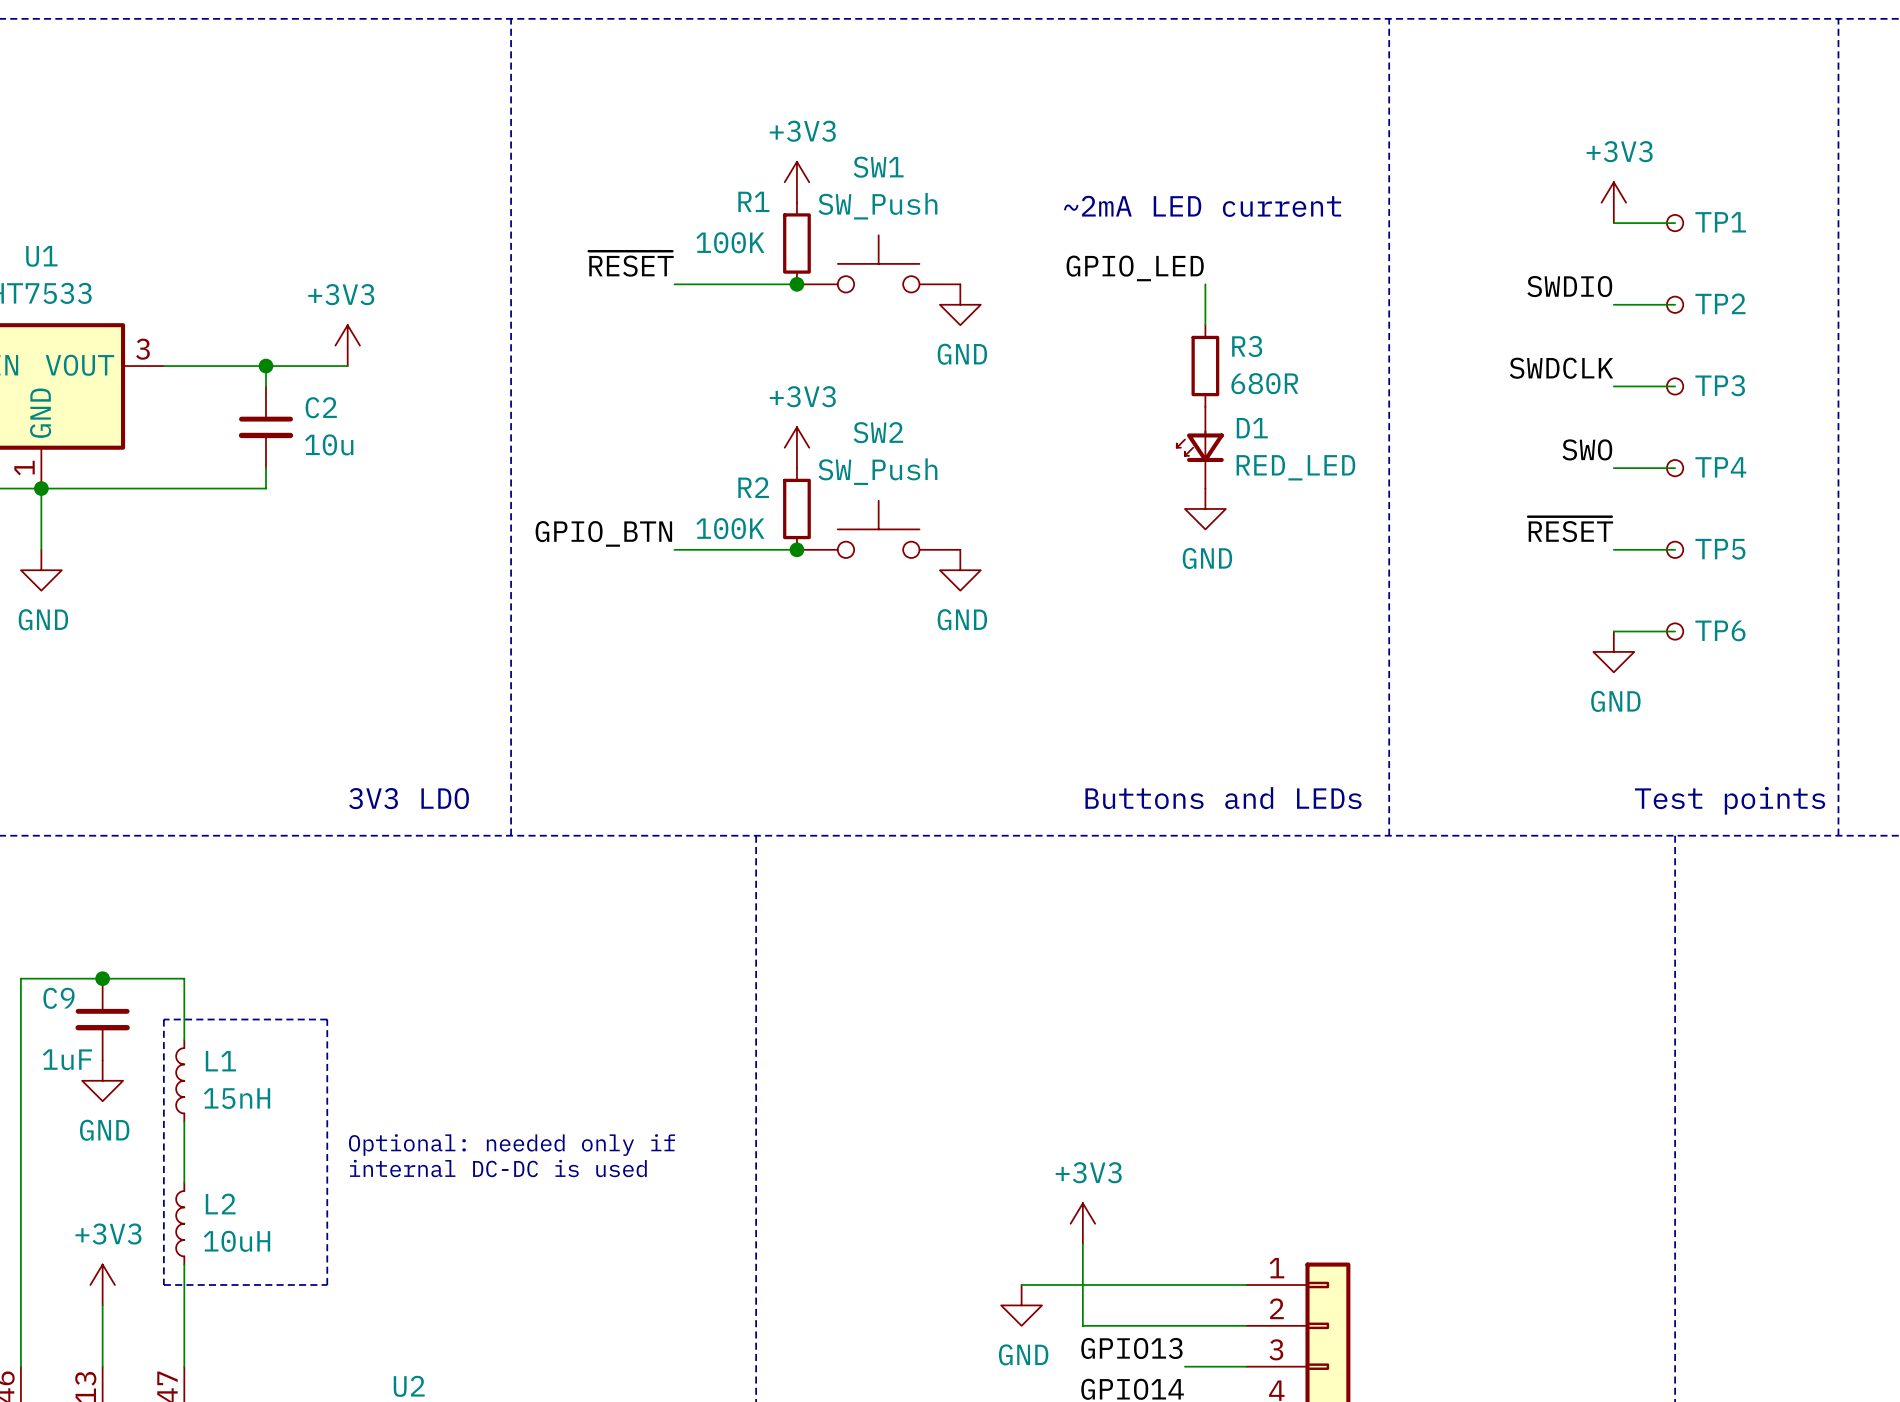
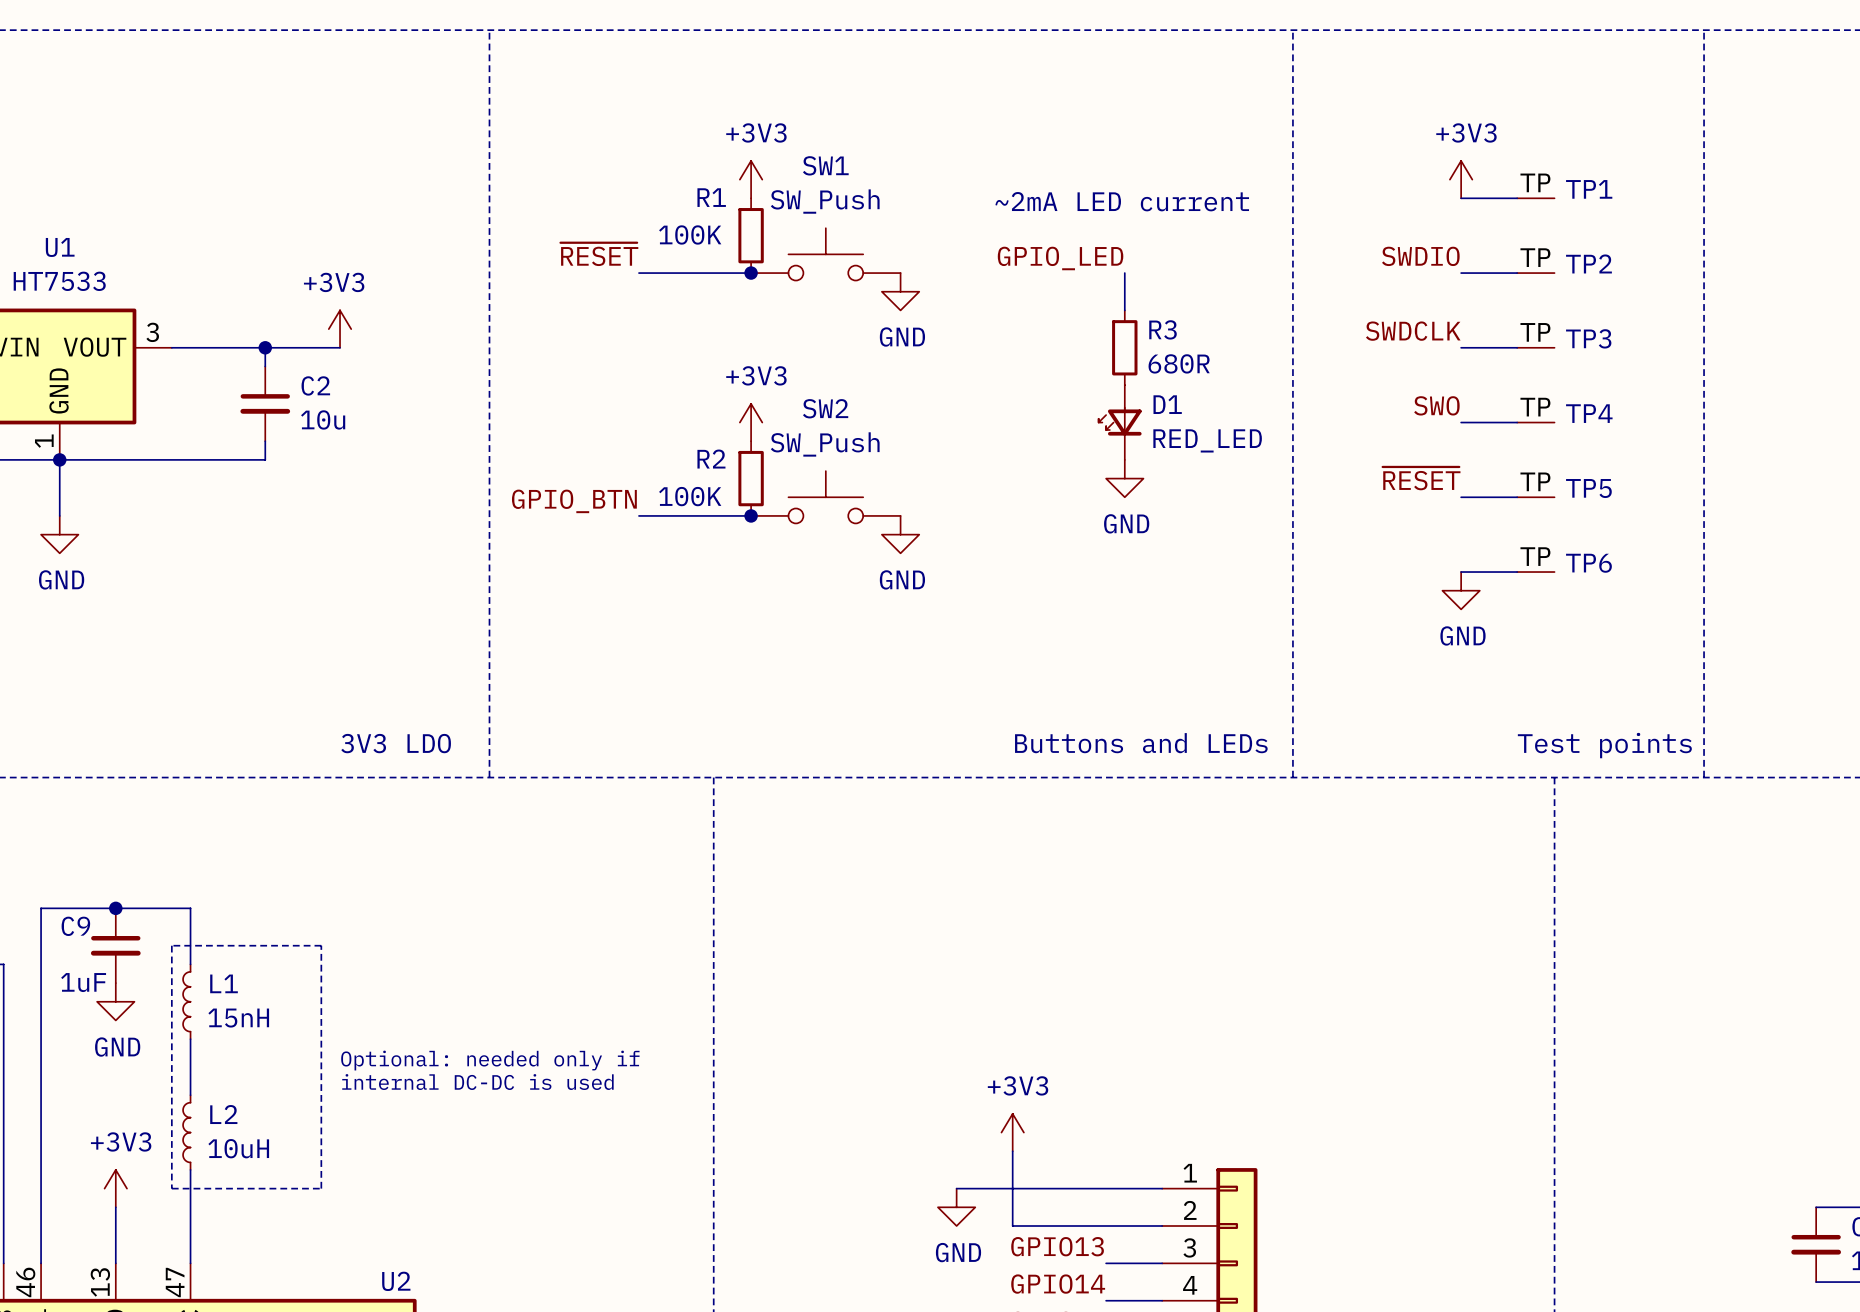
power symbol position: +3V3 (1613, 202) -> +3V3 (1461, 179)
TP1 symbol: [1666, 214, 1684, 232] -> [1517, 198, 1555, 199]
wire: (1613, 223) (1675, 223) -> (1461, 198) (1517, 198)
label position: SWDIO (1569, 286) -> SWDIO (1420, 256)
TP2 symbol: [1666, 296, 1684, 313] -> [1517, 273, 1555, 274]
wire: (1613, 304) (1675, 304) -> (1461, 273) (1517, 273)
label position: SWDCLK (1561, 368) -> SWDCLK (1413, 331)
TP3 symbol: [1666, 378, 1684, 395] -> [1517, 347, 1555, 348]
wire: (1613, 386) (1675, 386) -> (1461, 347) (1517, 347)
label position: SWO (1587, 449) -> SWO (1436, 405)
TP4 symbol: [1666, 459, 1684, 477] -> [1517, 422, 1555, 423]
wire: (1613, 468) (1675, 468) -> (1461, 422) (1517, 422)
label position: ~{RESET} (1570, 529) -> ~{RESET} (1421, 478)
TP5 symbol: [1666, 541, 1684, 558] -> [1517, 497, 1555, 498]
wire: (1613, 549) (1675, 549) -> (1461, 497) (1517, 497)
TP6 symbol: [1666, 623, 1684, 640] -> [1517, 572, 1555, 573]
wire: (1613, 631) (1675, 631) -> (1461, 572) (1517, 572)
power symbol position: GND (1613, 651) -> GND (1461, 590)

